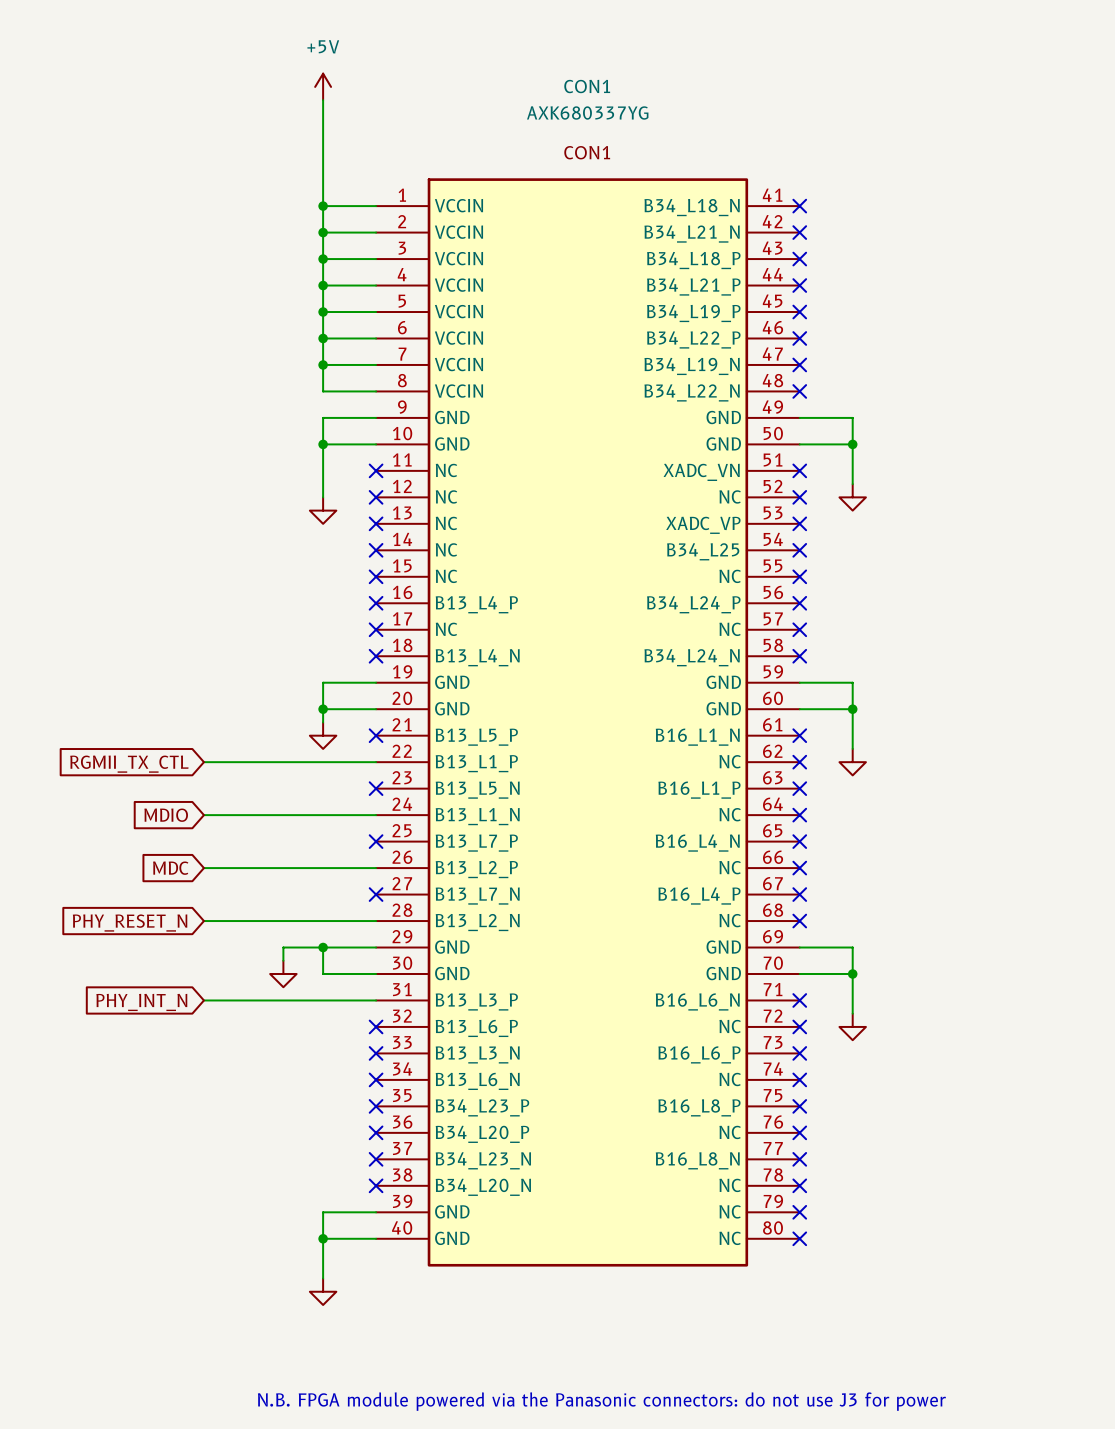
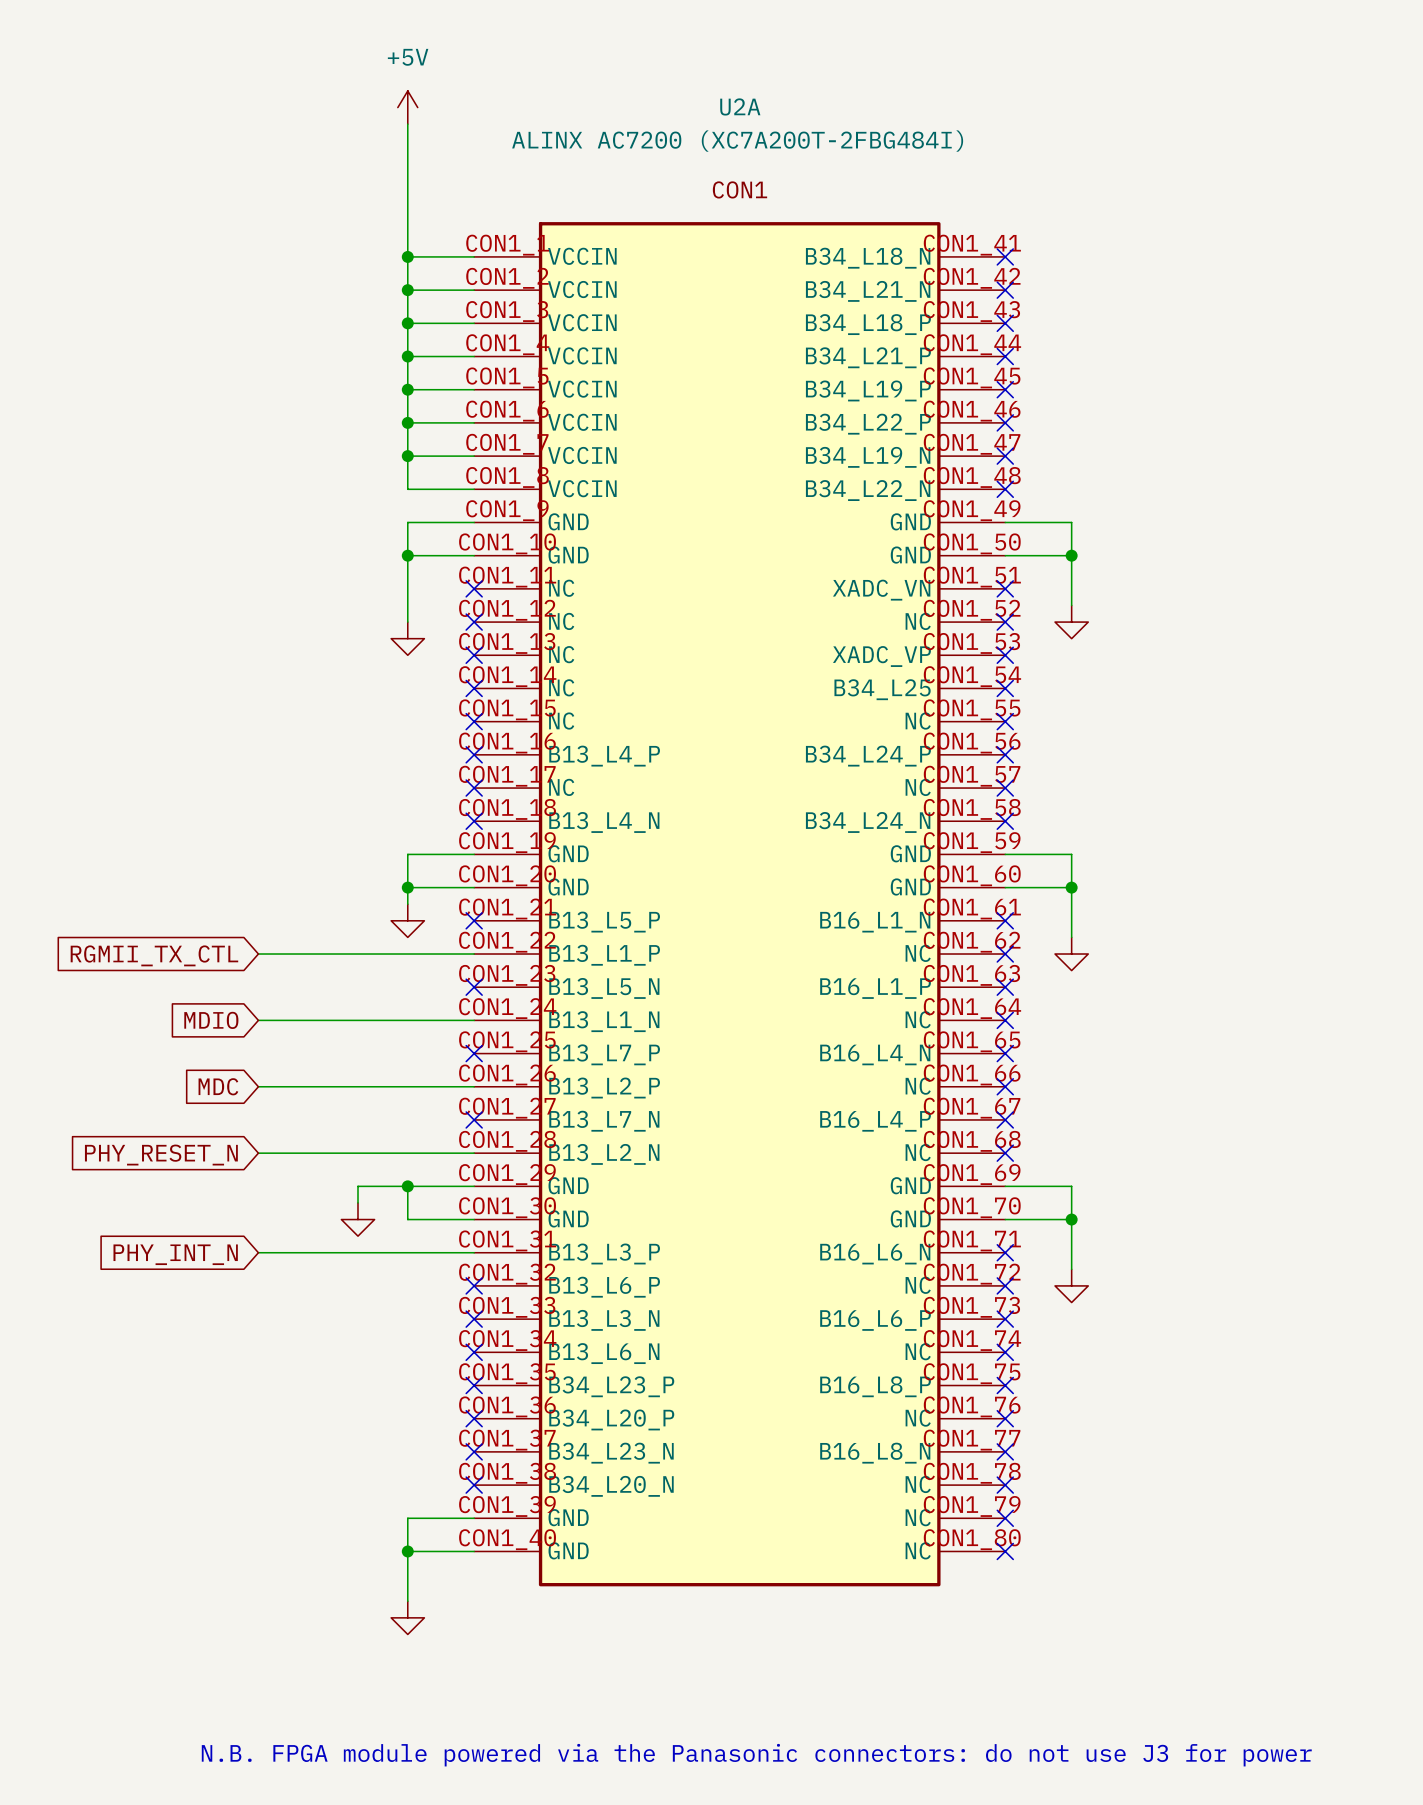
CON1 name: CON1 (587, 86) -> U2A (740, 106)
CON1 value: AXK680337YG (587, 112) -> ALINX AC7200 (XC7A200T-2FBG484I) (737, 141)
CON1 symbol: [376, 178, 800, 1267] -> [474, 222, 1006, 1587]

